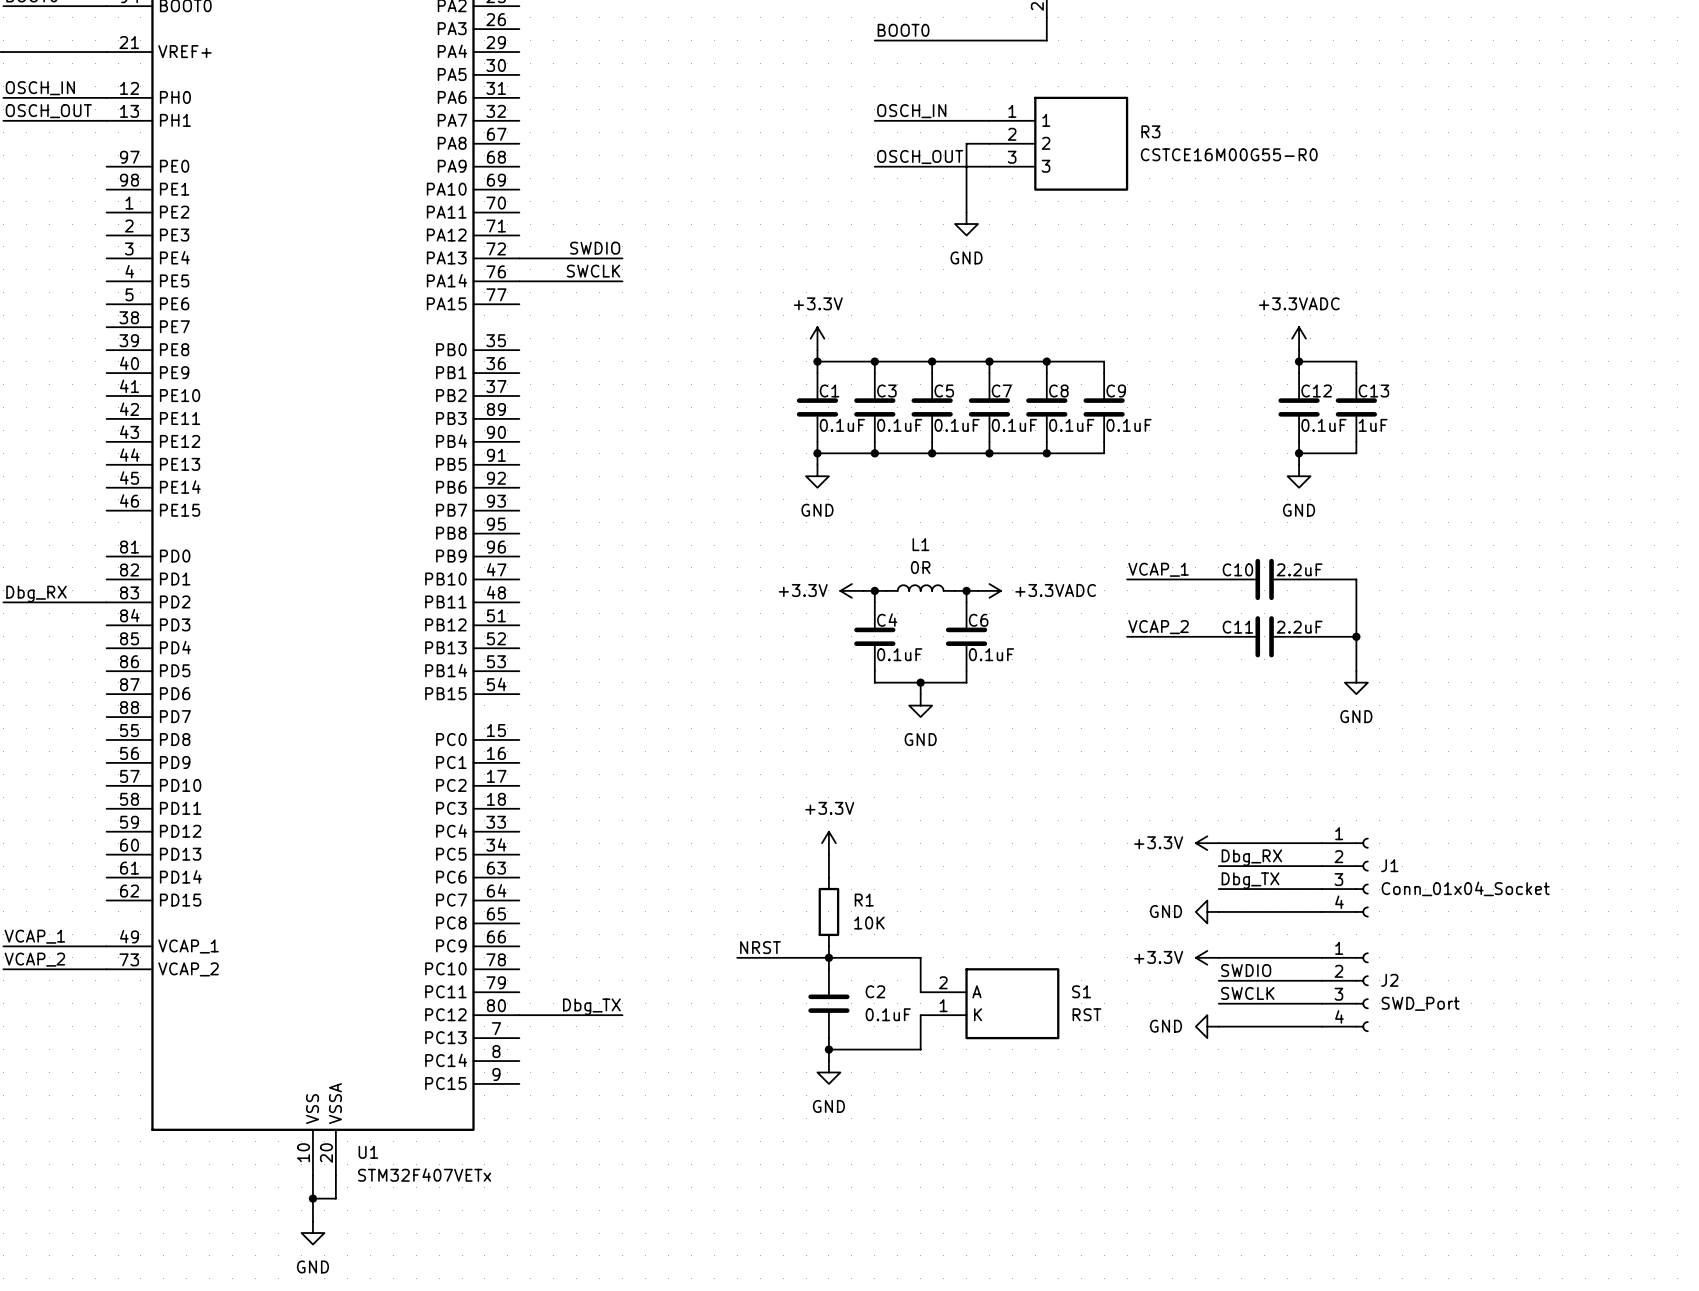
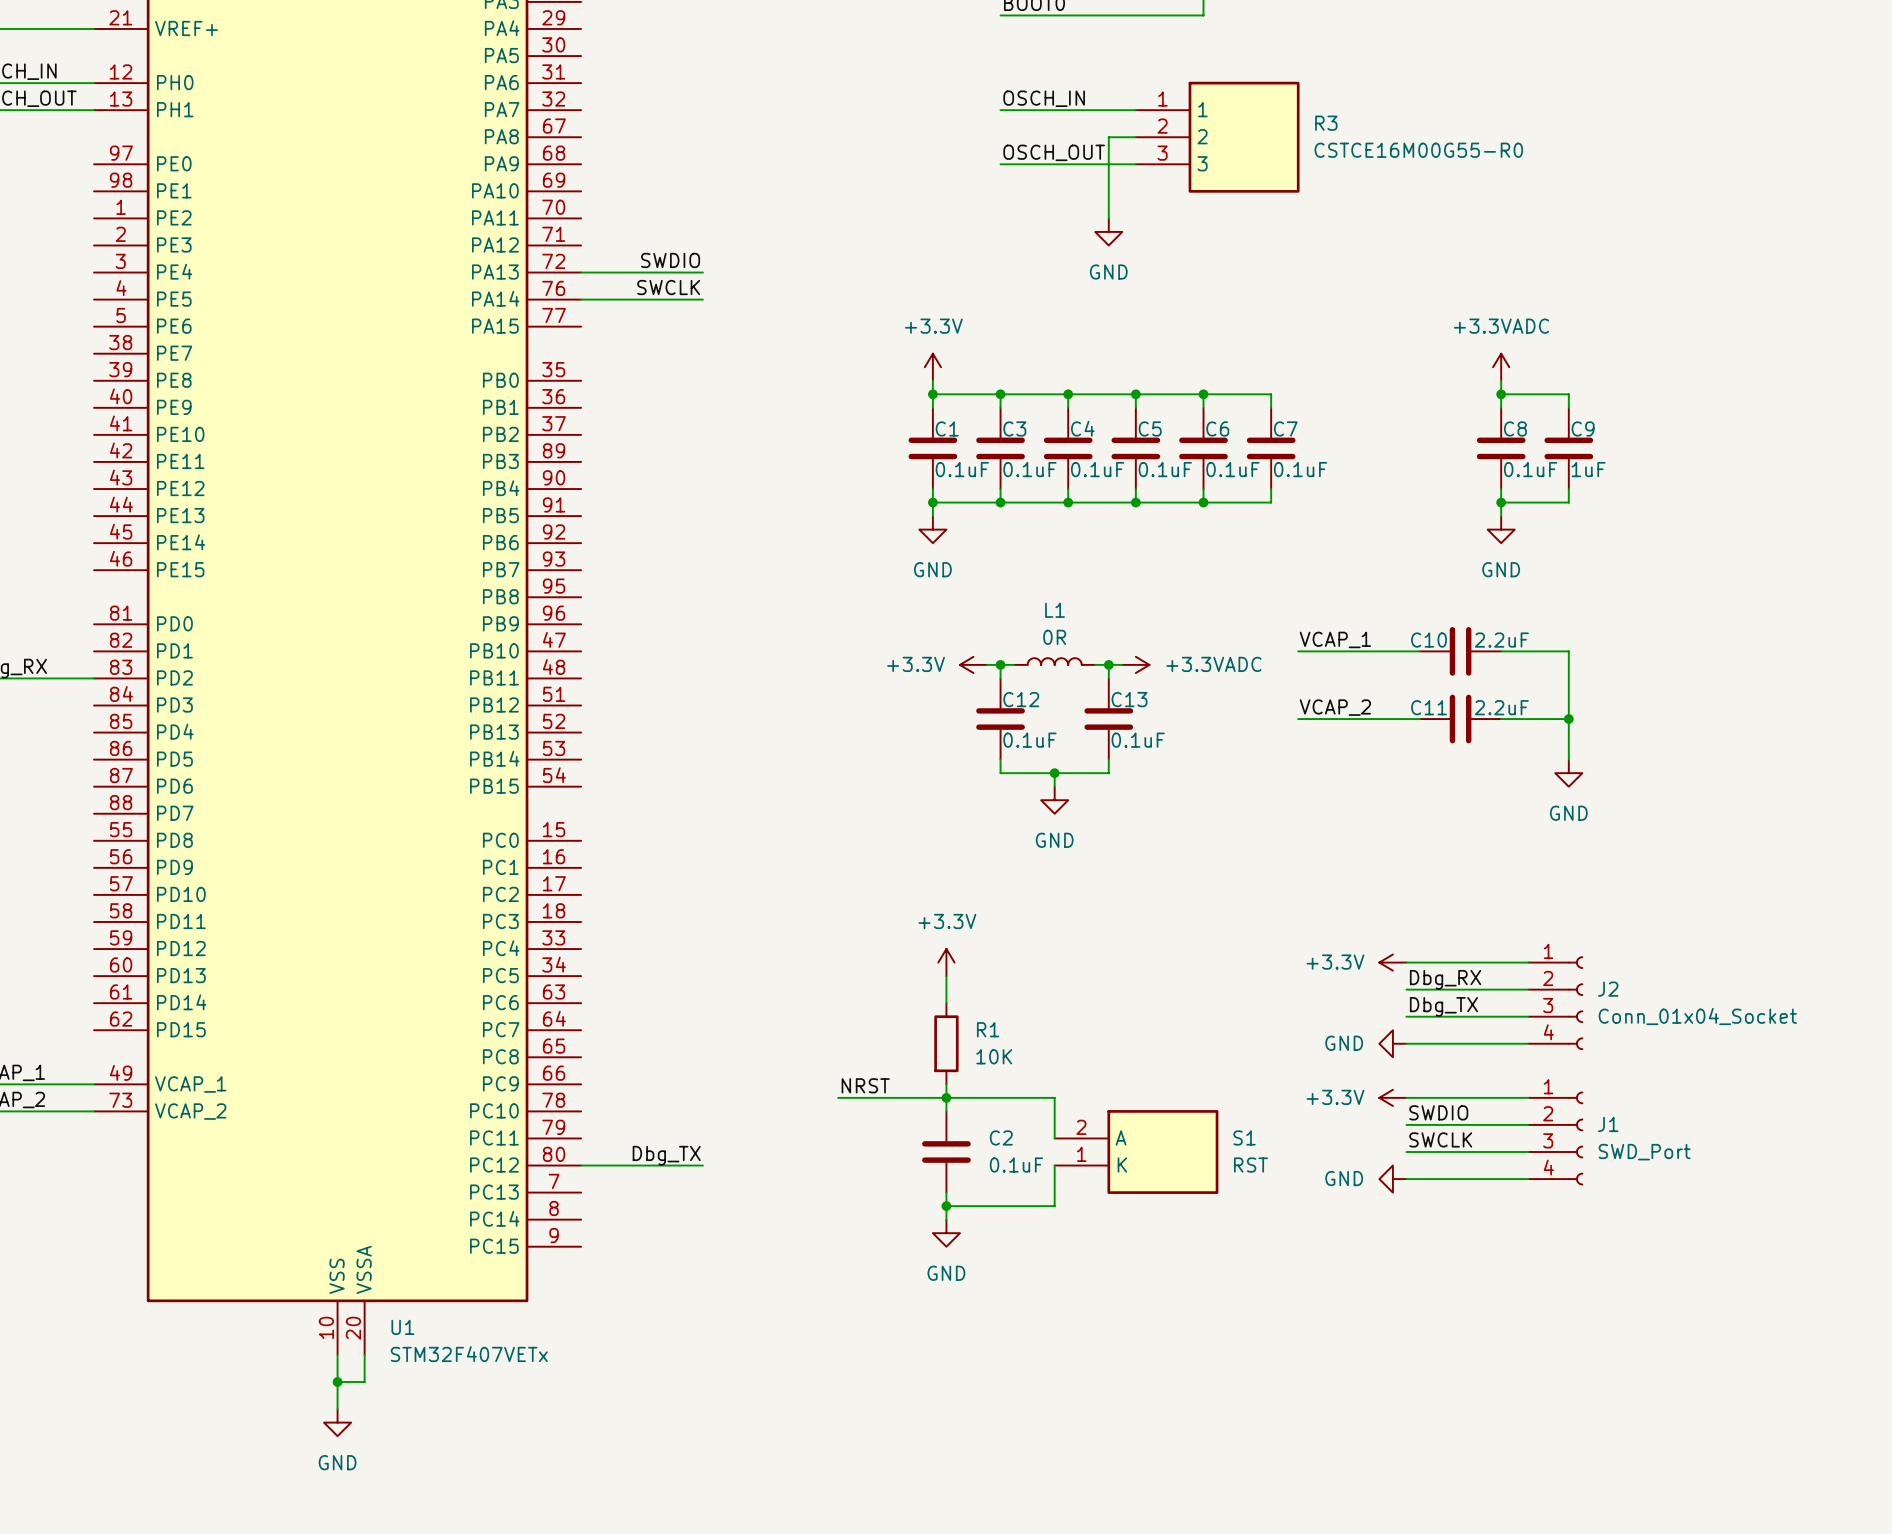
C5 name: C5 (944, 390) -> C4 (1082, 428)
C7 name: C7 (1001, 390) -> C5 (1150, 428)
C8 name: C8 (1058, 390) -> C6 (1217, 428)
C9 name: C9 (1116, 390) -> C7 (1285, 428)
C12 name: C12 (1316, 390) -> C8 (1515, 428)
C13 name: C13 (1373, 390) -> C9 (1583, 428)
C4 name: C4 (887, 620) -> C12 (1021, 699)
C6 name: C6 (978, 620) -> C13 (1129, 699)
J1 name: J1 (1389, 865) -> J2 (1608, 989)
J2 name: J2 (1389, 980) -> J1 (1608, 1124)

